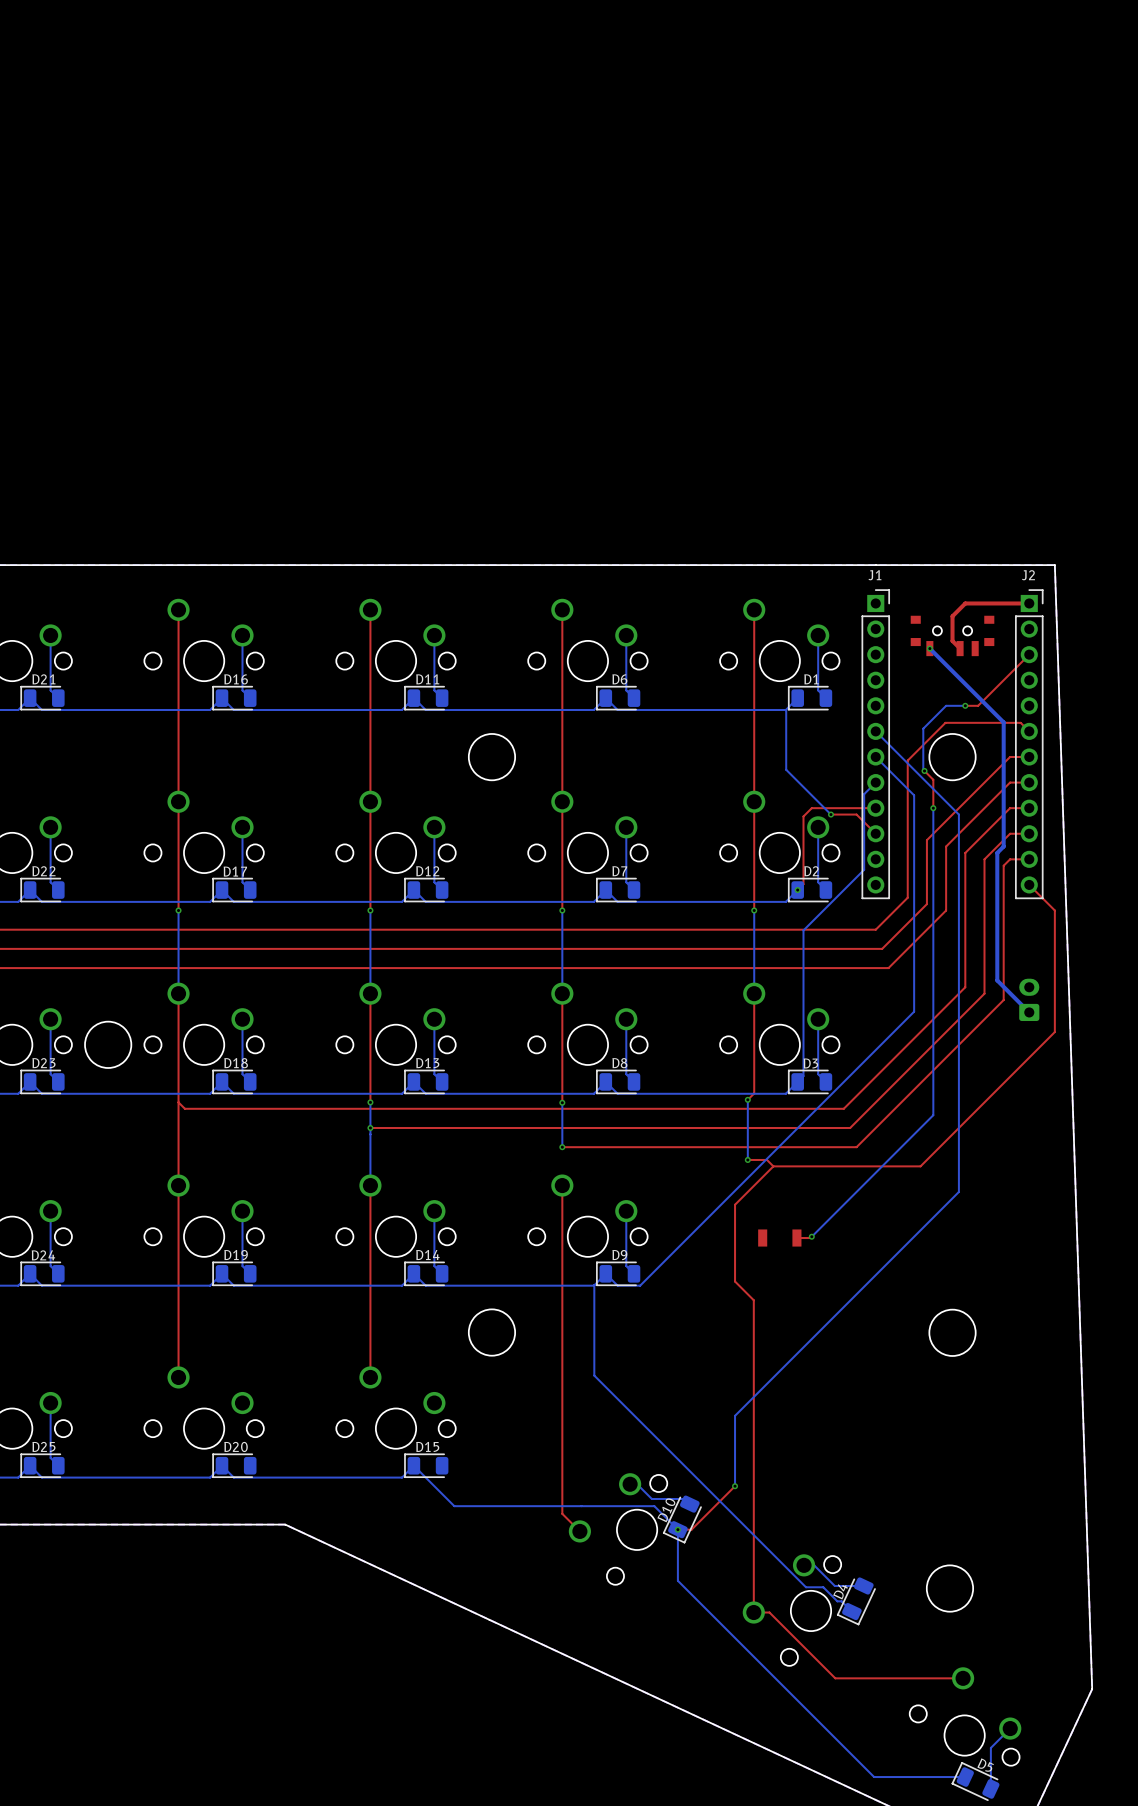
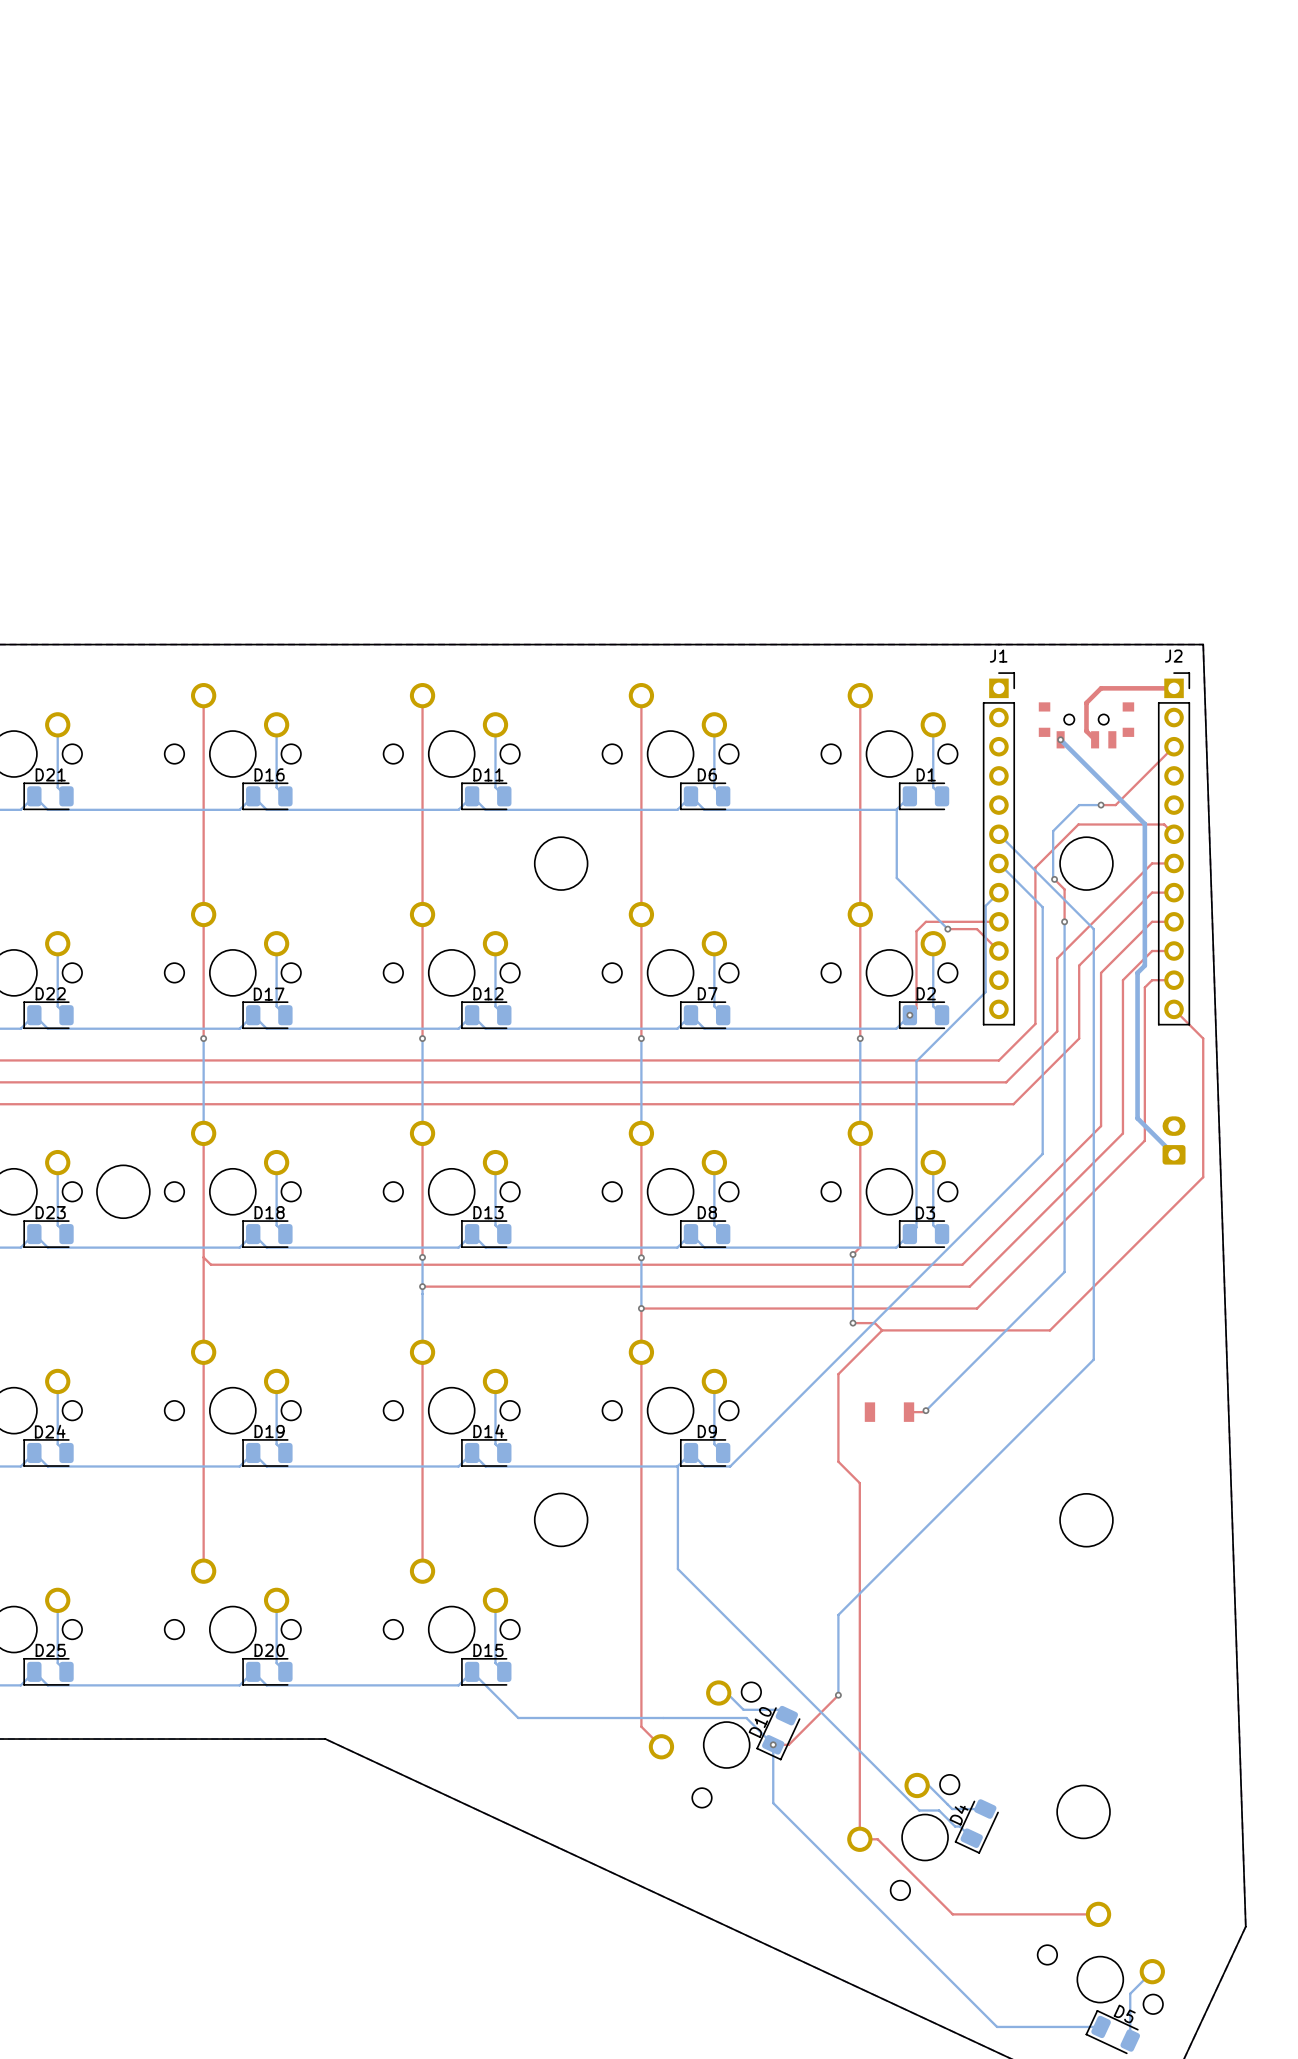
top track: none -> (641, 1308) (641, 1352)
bottom track: none -> (276, 1600) (276, 1663) (285, 1671)
bottom track: none -> (495, 1600) (495, 1663) (504, 1671)

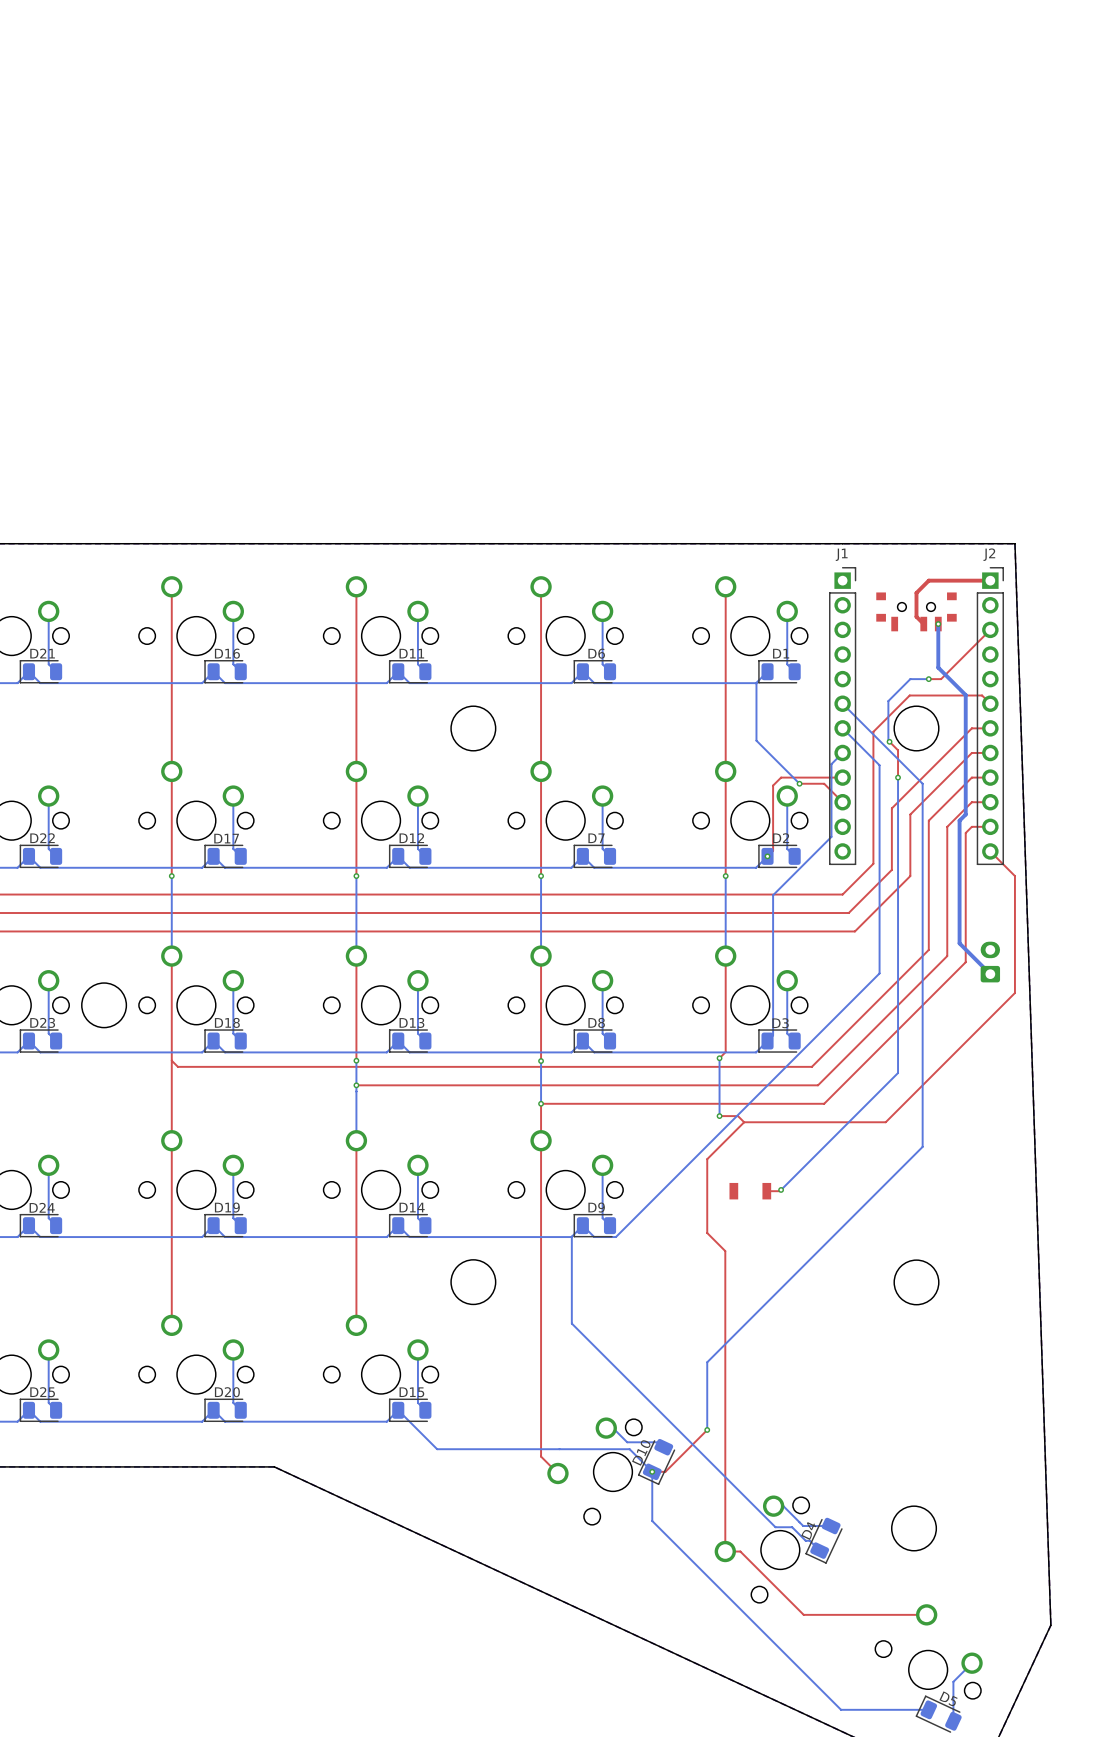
bottom track: (1060, 739) (1112, 791) -> (938, 624) (938, 667)
via position: (1060, 739) -> (938, 624)

